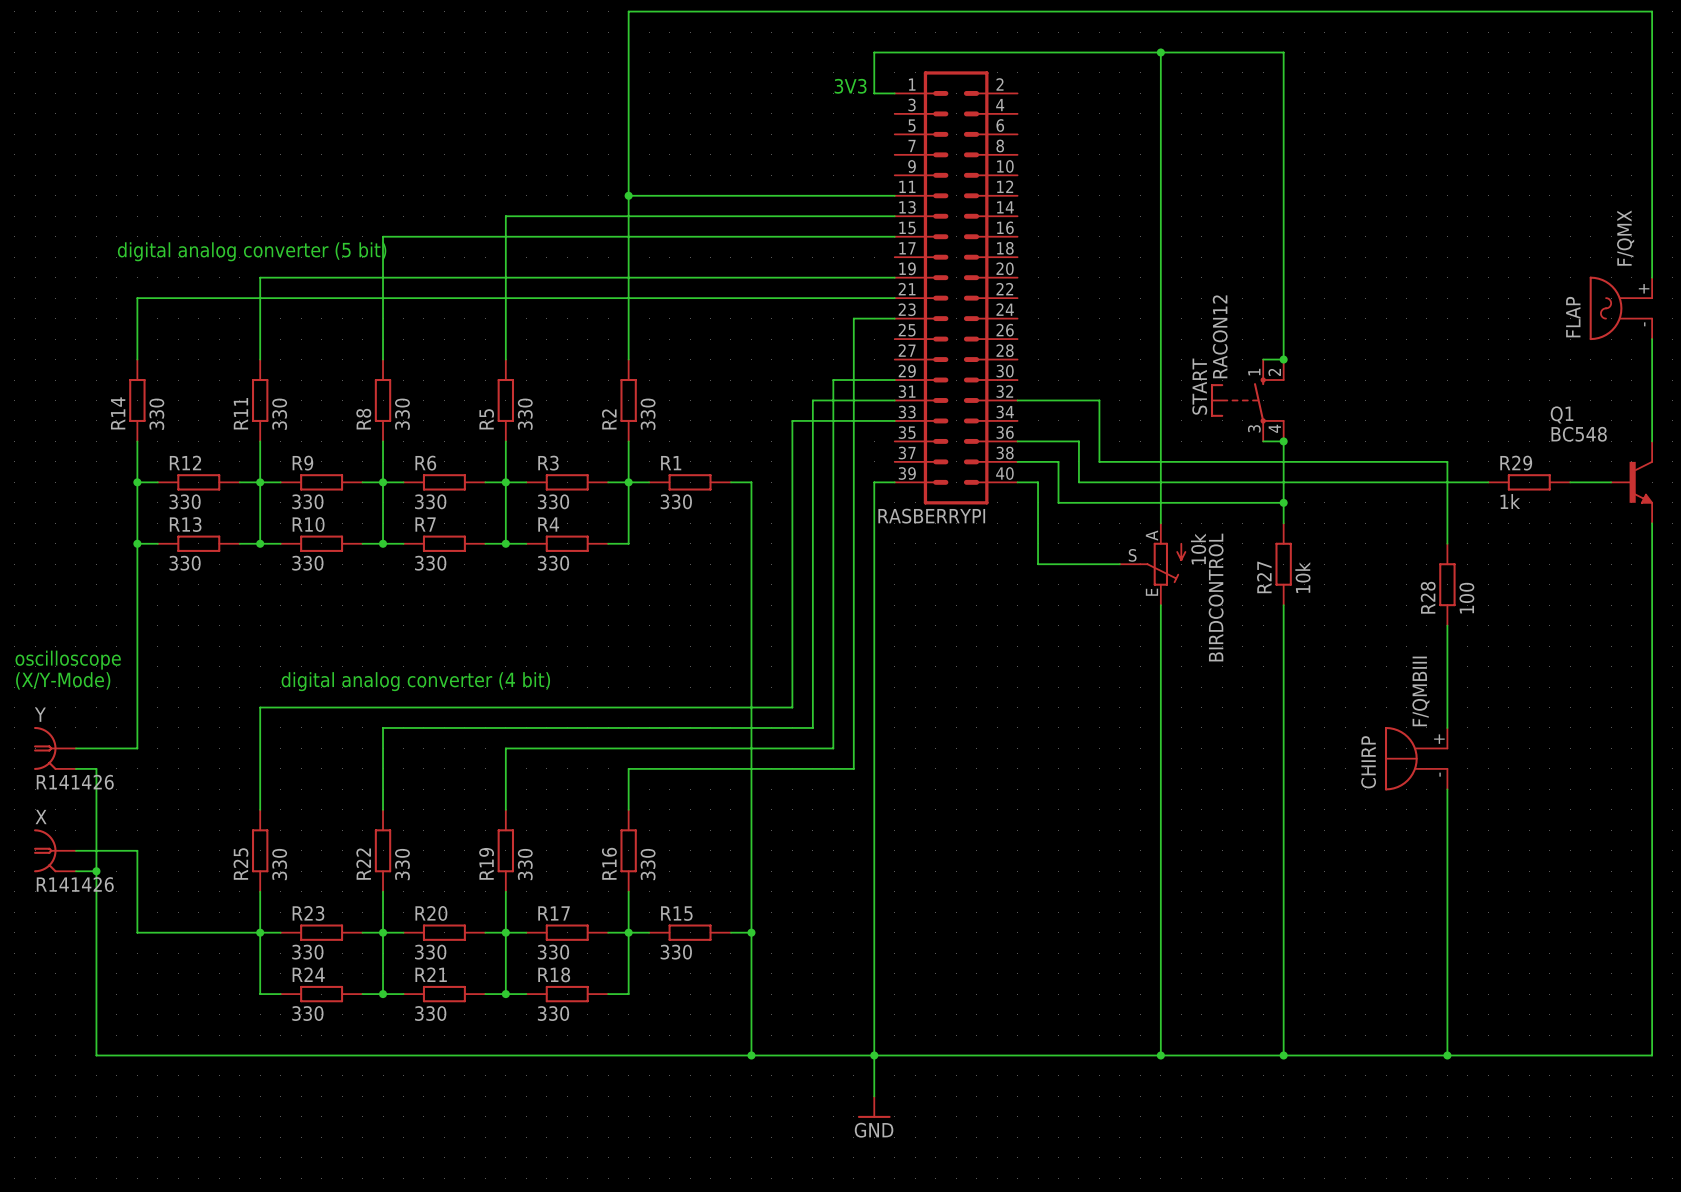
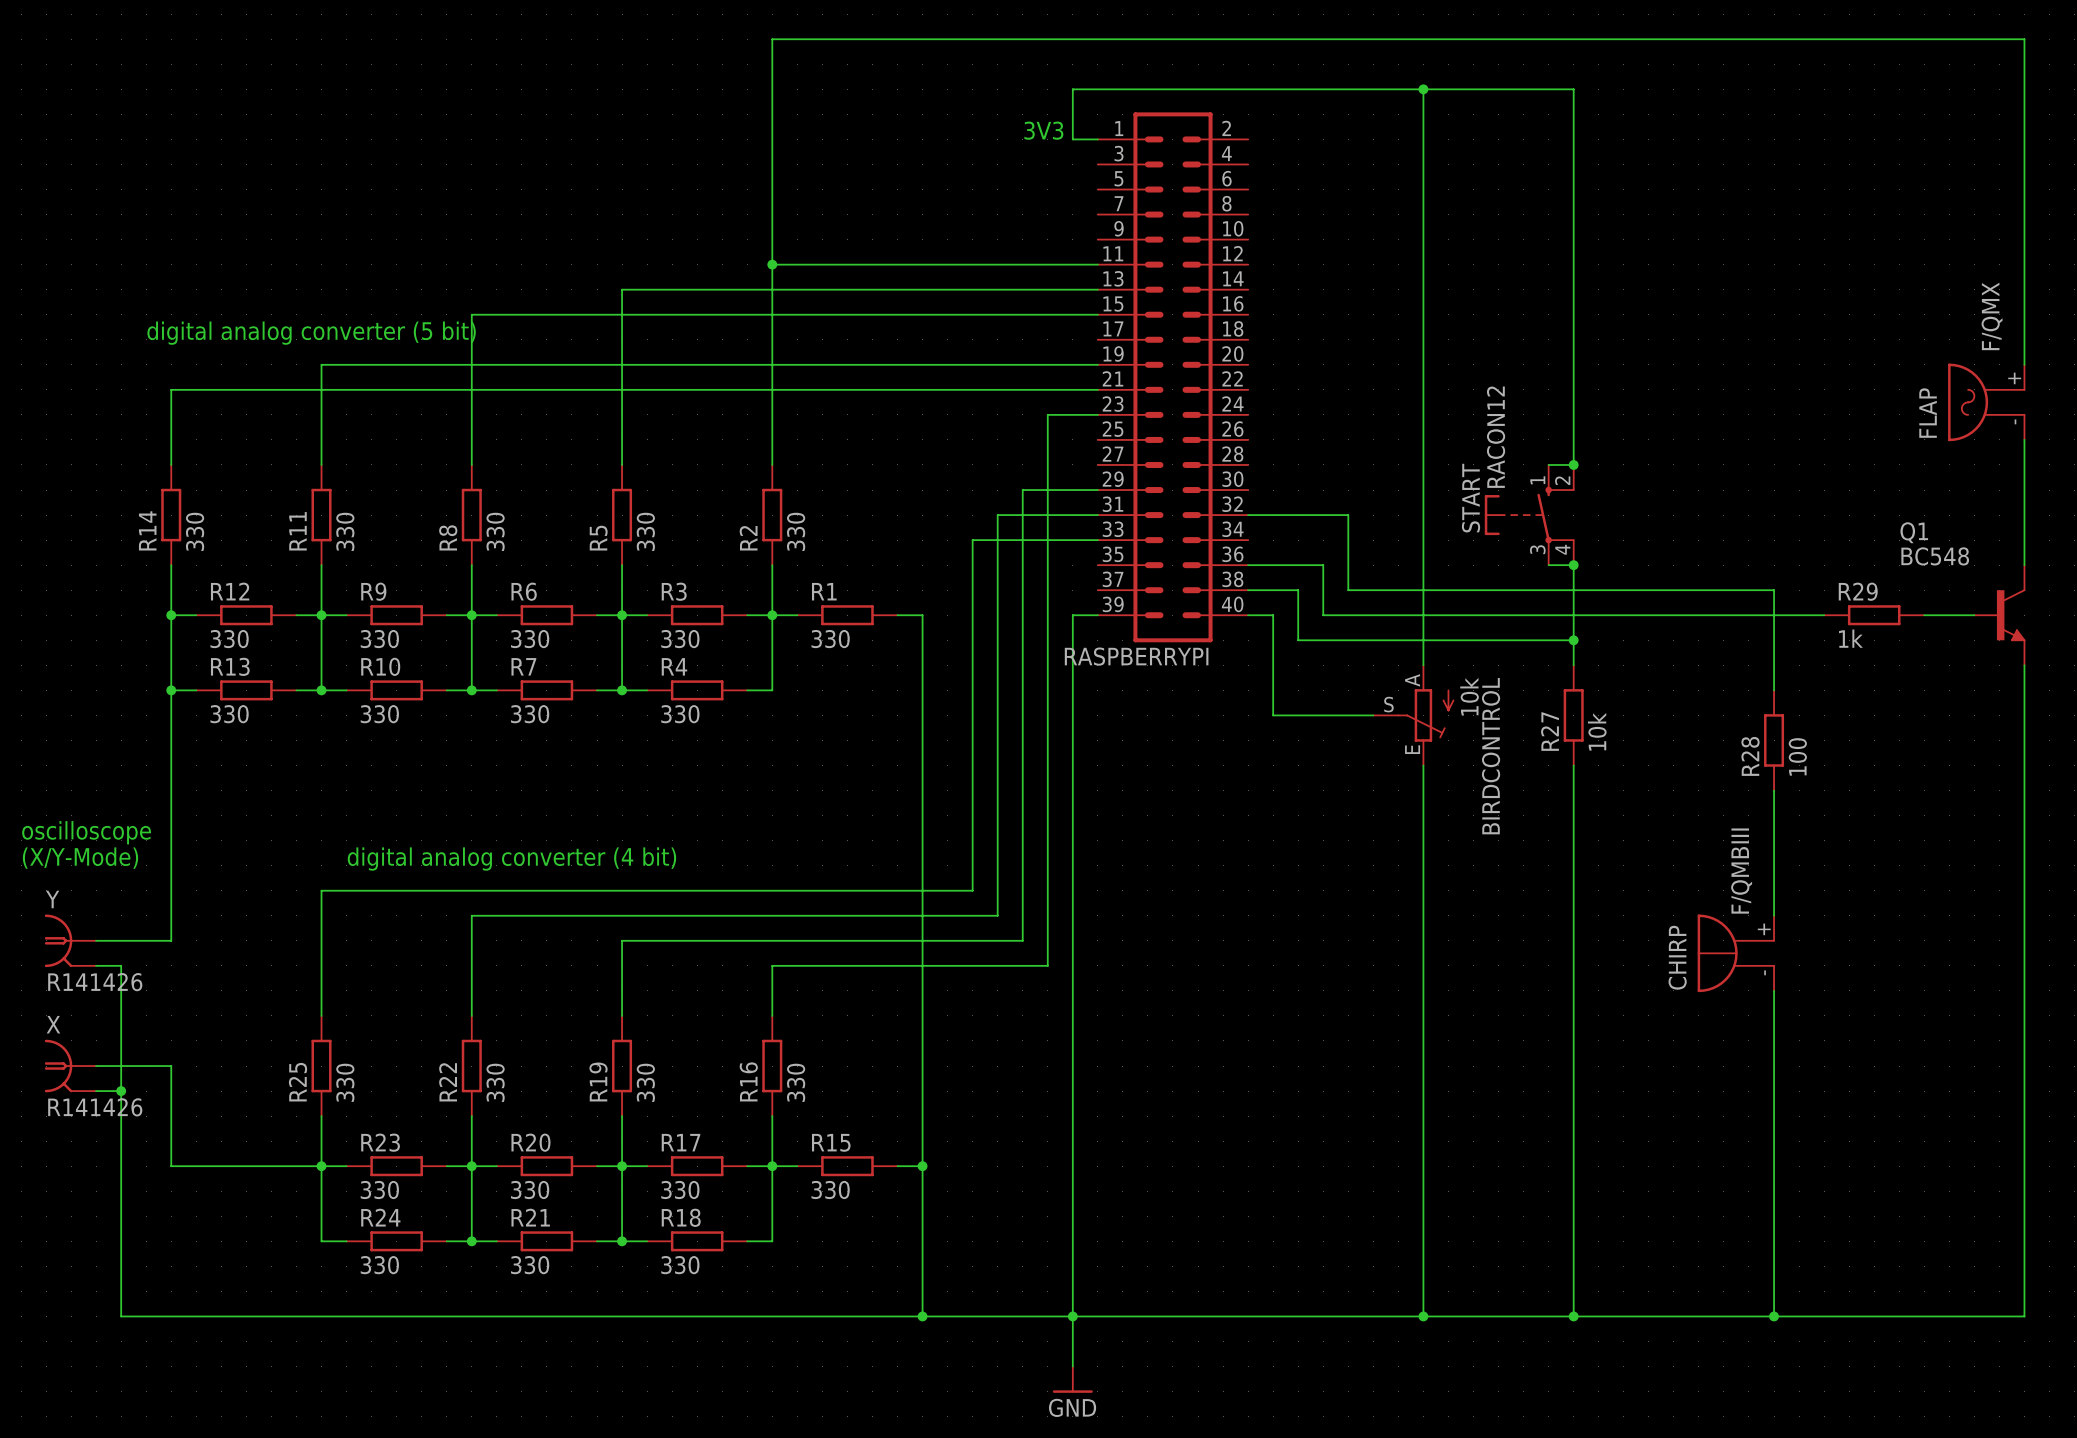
RASBERRYPI name: RASBERRYPI (931, 516) -> RASPBERRYPI (1136, 656)

